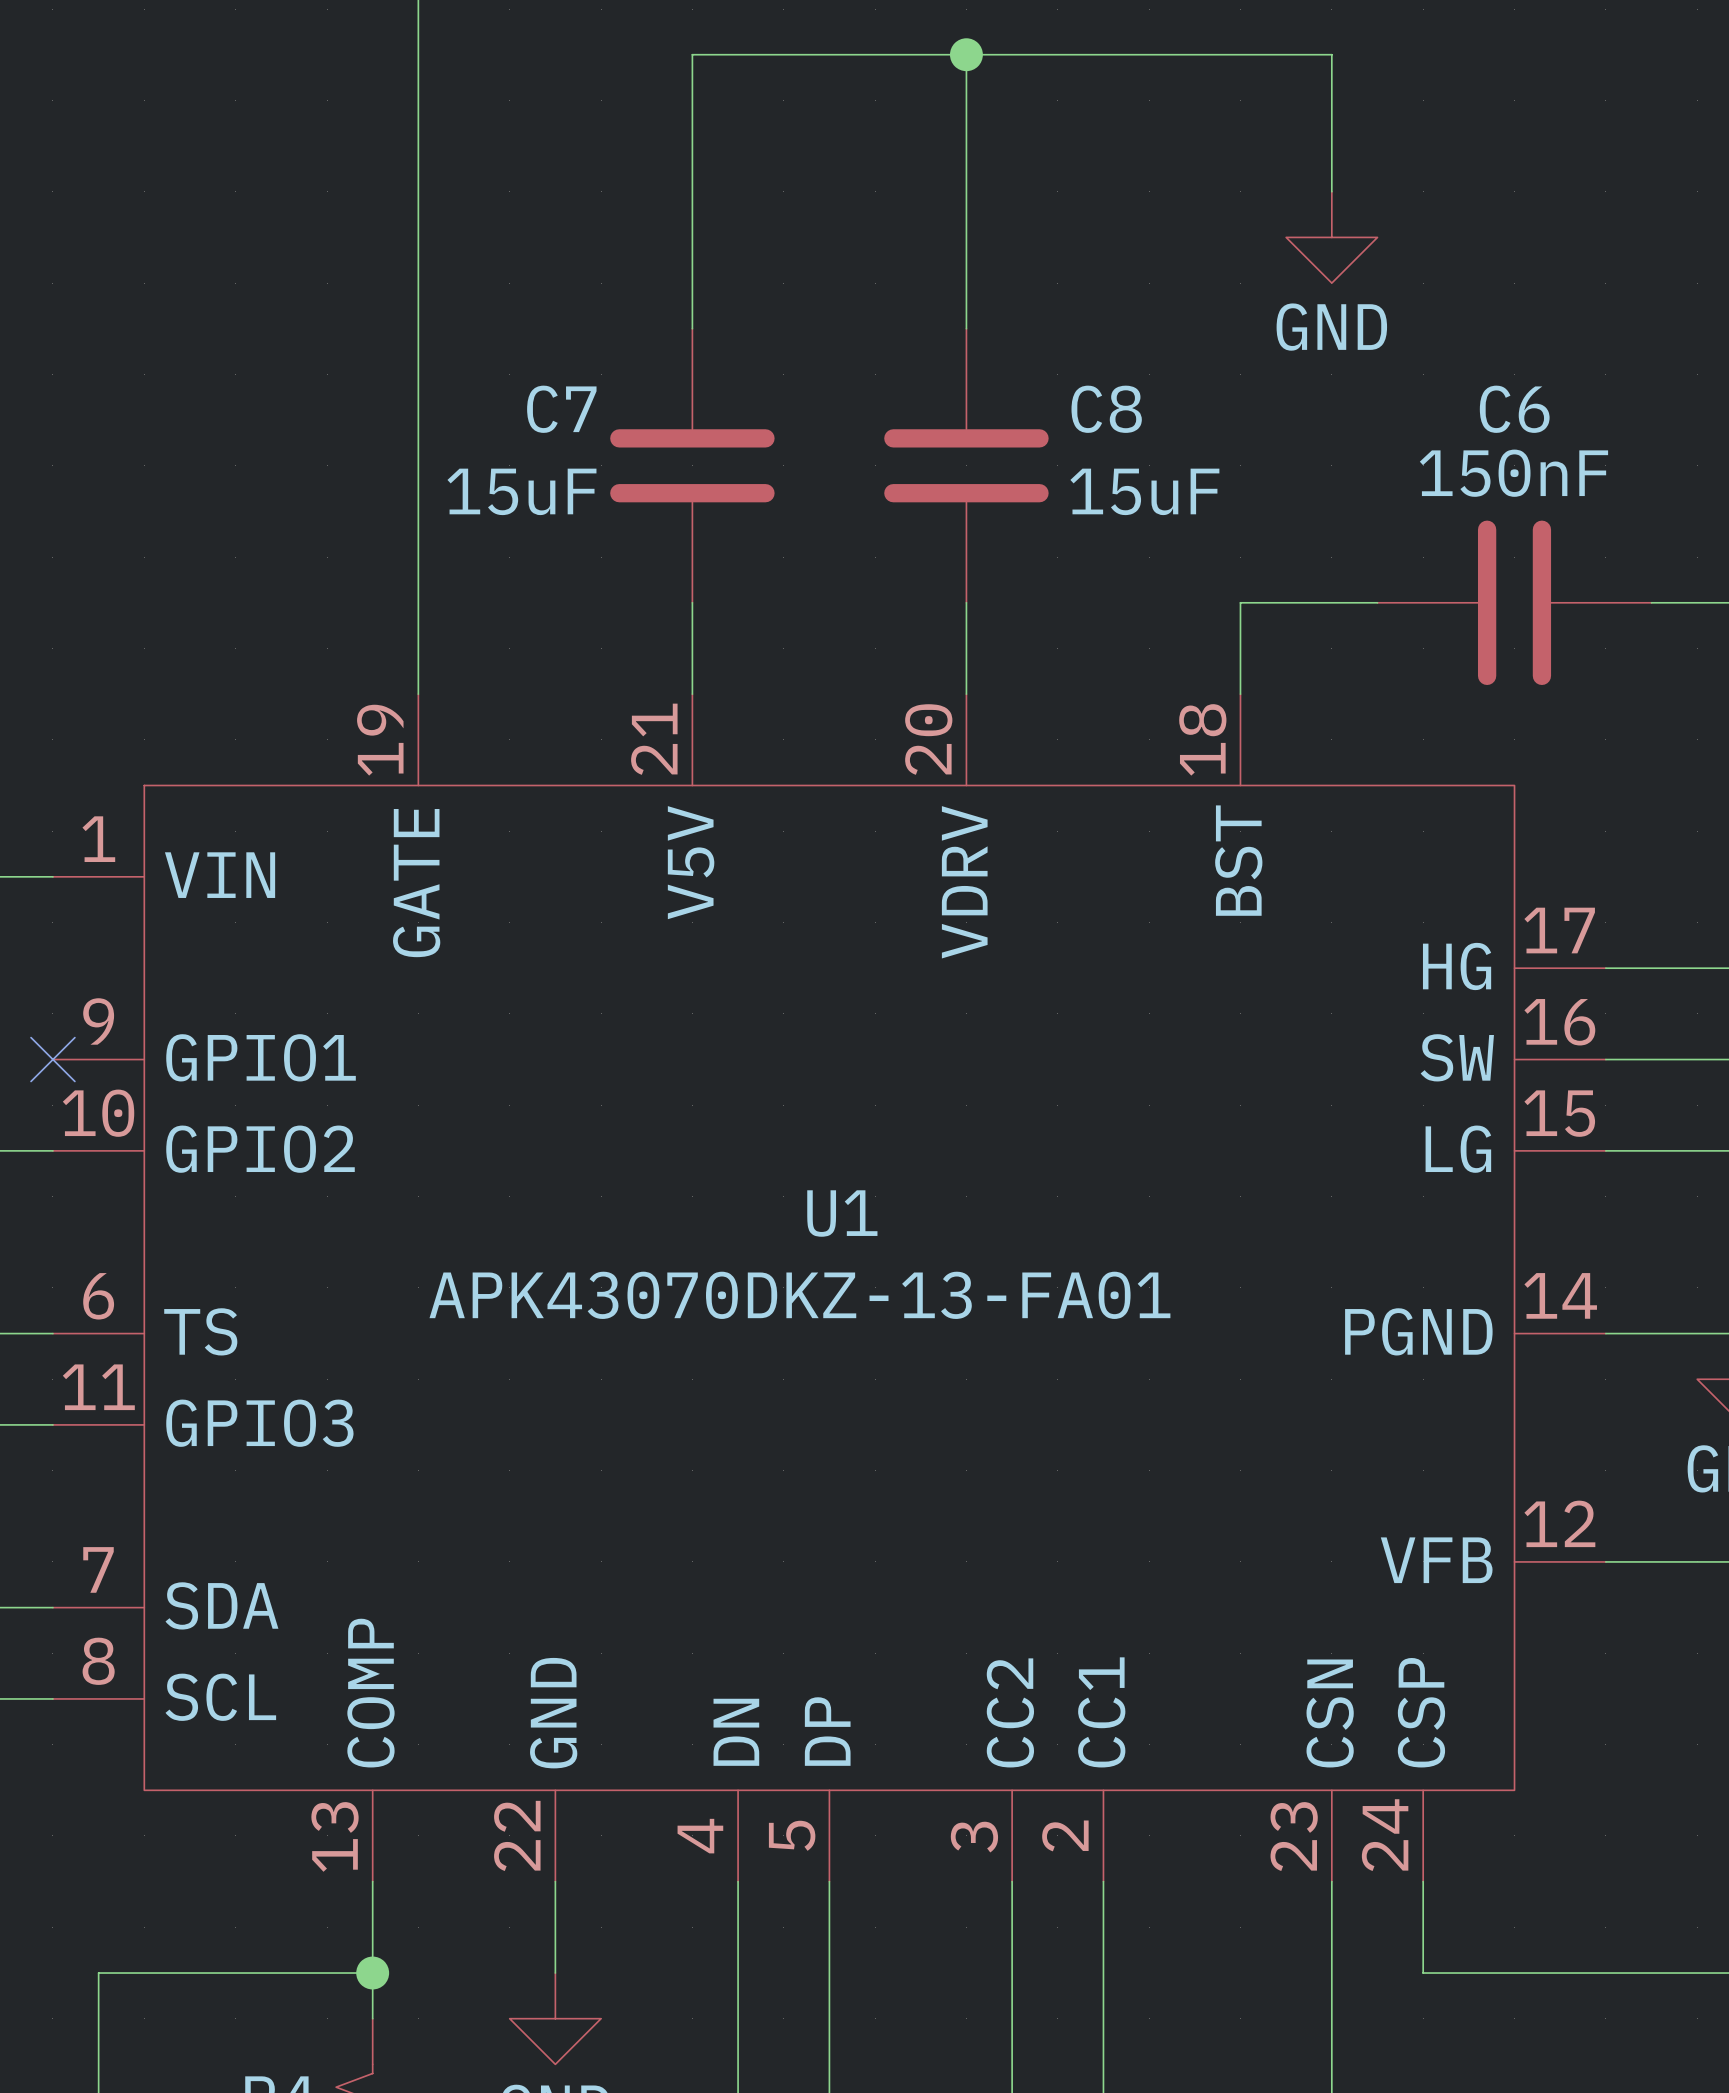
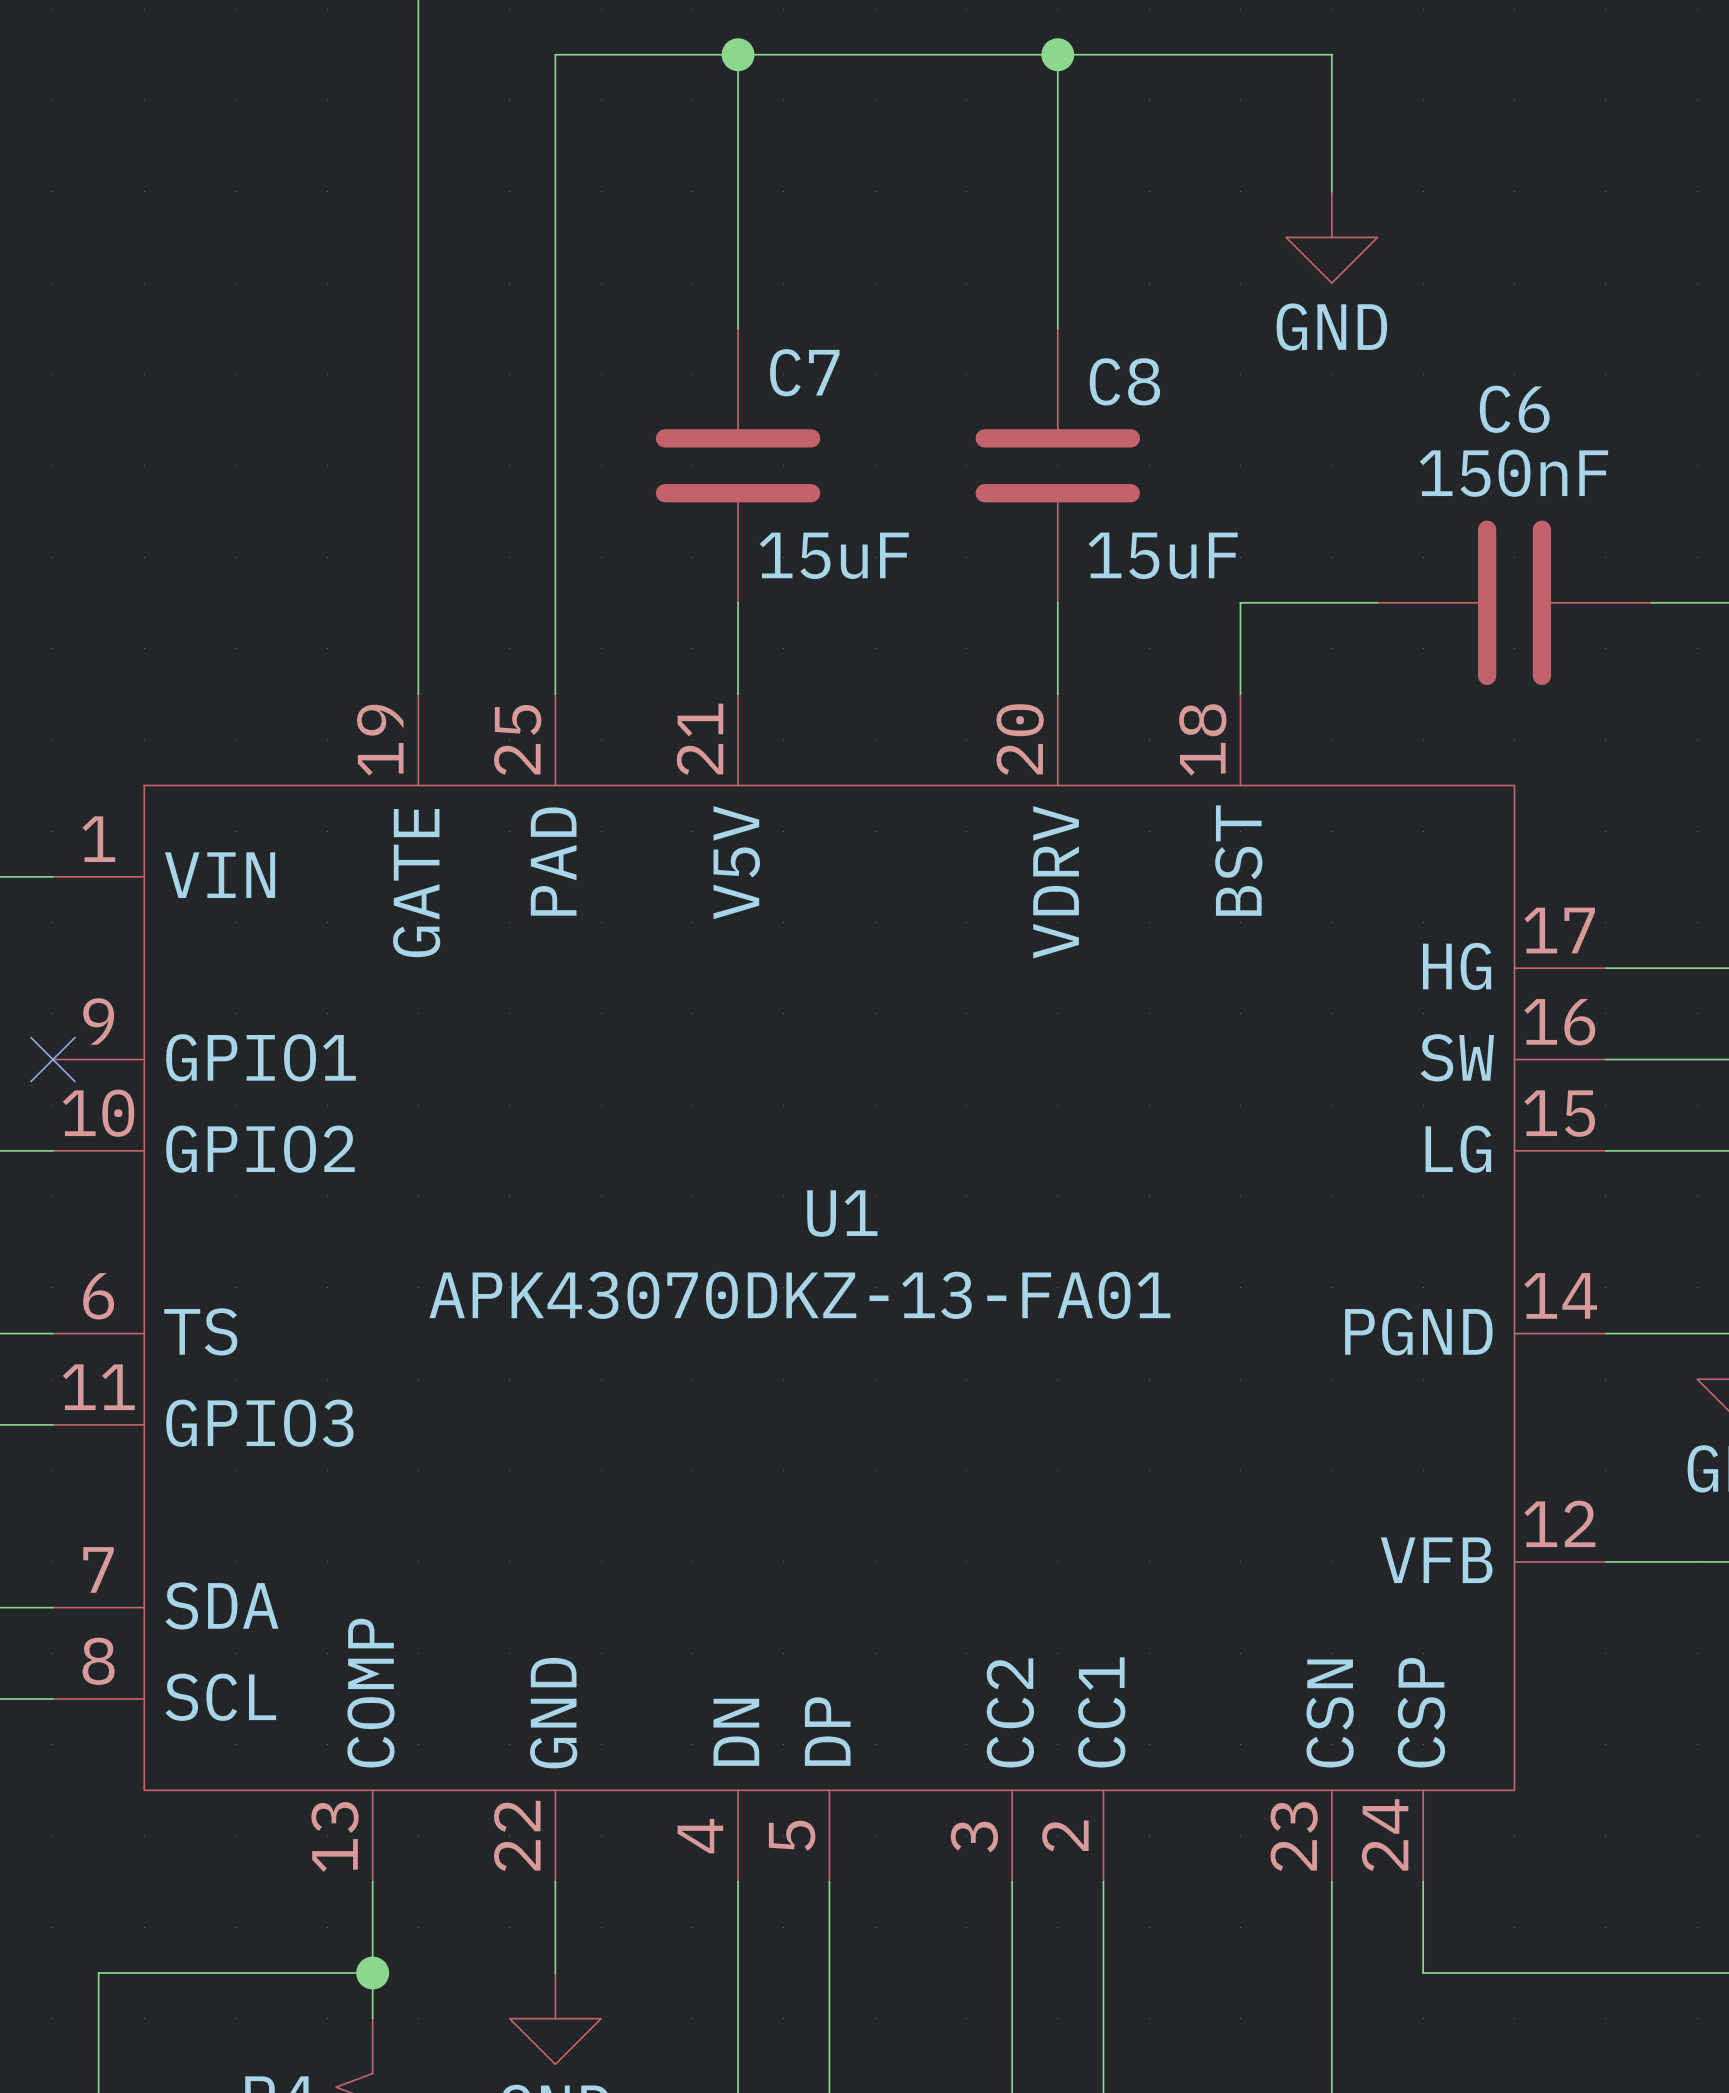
wire: (692, 54) (692, 328) -> (692, 54) (555, 54) (555, 694)
wire: none -> (738, 54) (738, 328)
junction: none -> (738, 54)
wire: (966, 54) (966, 328) -> (1057, 54) (1057, 328)
junction position: (966, 54) -> (1057, 54)
C7 name position: C7 (561, 409) -> C7 (804, 372)
C8 name position: C8 (1106, 409) -> C8 (1124, 381)
C7 position: (692, 465) -> (738, 465)
C8 position: (966, 465) -> (1057, 465)
C7 value position: 15uF (521, 491) -> 15uF (834, 555)
C8 value position: 15uF (1144, 491) -> 15uF (1163, 555)
wire: (692, 602) (692, 694) -> (738, 602) (738, 694)
wire: (966, 602) (966, 694) -> (1057, 602) (1057, 694)
U1 symbol: [52, 694, 1606, 1882] -> [52, 694, 1606, 1882]

